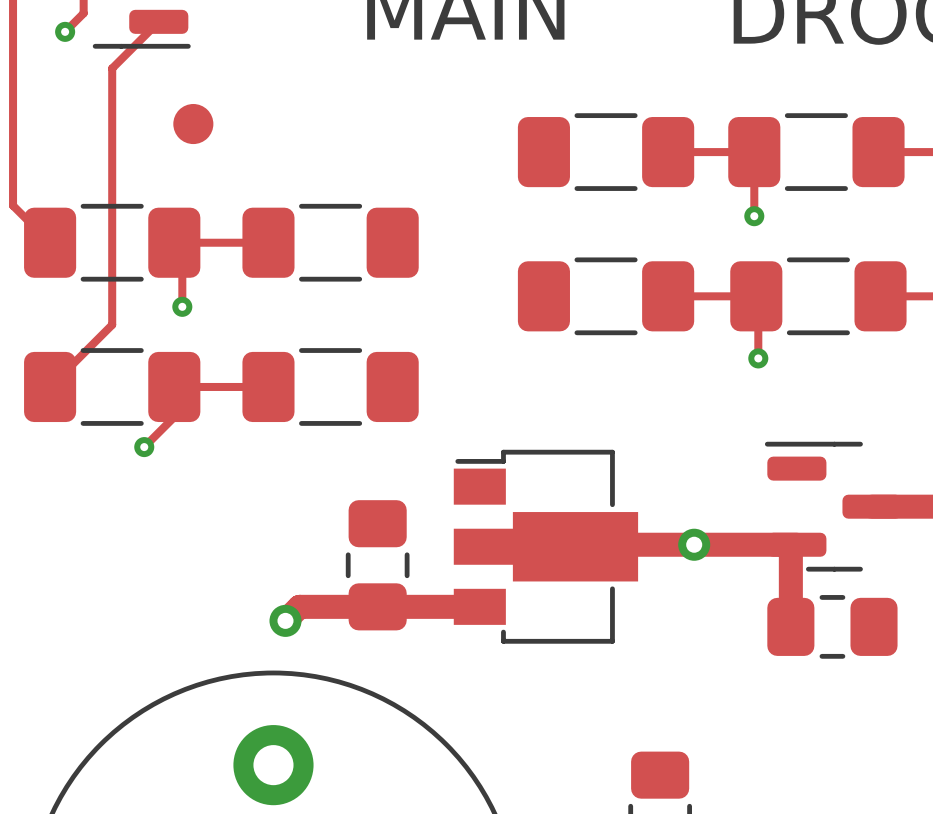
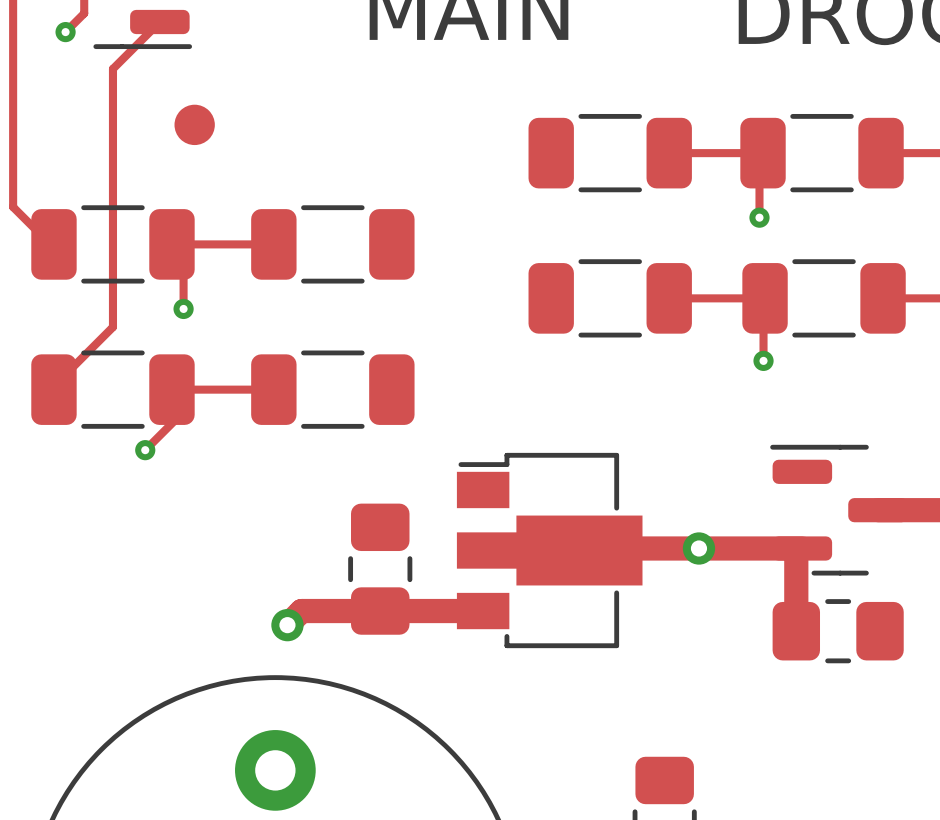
part footprint: [517, 113, 695, 191] -> [528, 113, 692, 193]
part footprint: [728, 113, 905, 191] -> [740, 113, 904, 193]
part footprint: [24, 203, 201, 282] -> [31, 205, 195, 284]
part footprint: [242, 203, 419, 282] -> [251, 205, 415, 284]
part footprint: [517, 257, 695, 336] -> [528, 259, 692, 338]
part footprint: [730, 257, 907, 336] -> [742, 259, 906, 338]
part footprint: [24, 348, 201, 426] -> [31, 350, 195, 429]
part footprint: [242, 348, 419, 426] -> [251, 350, 415, 429]

